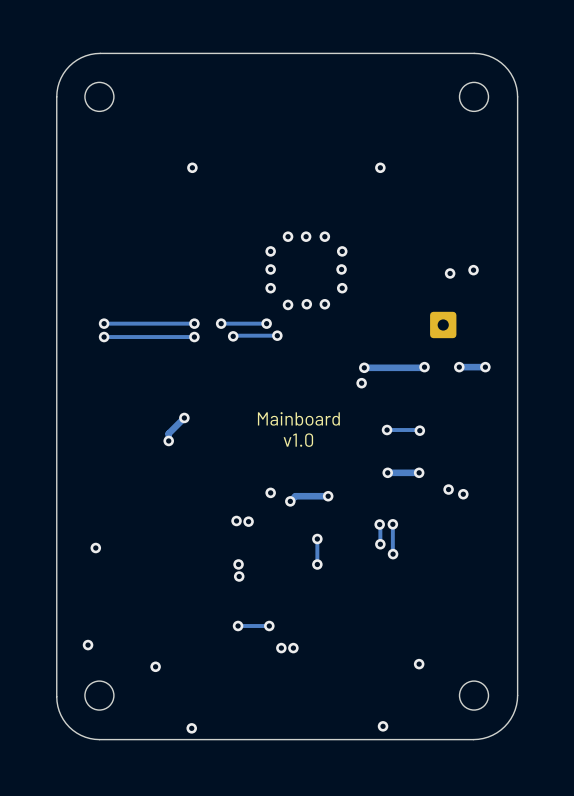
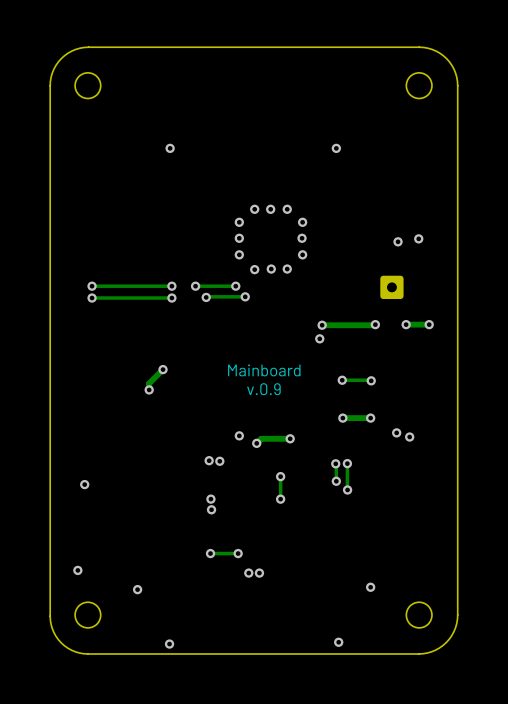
text: v1.0 (298, 440) -> v.0.9 (263, 389)

